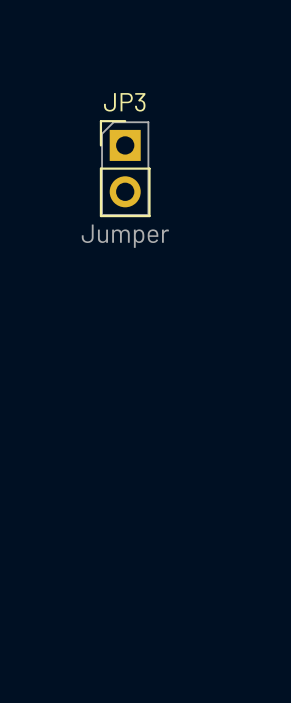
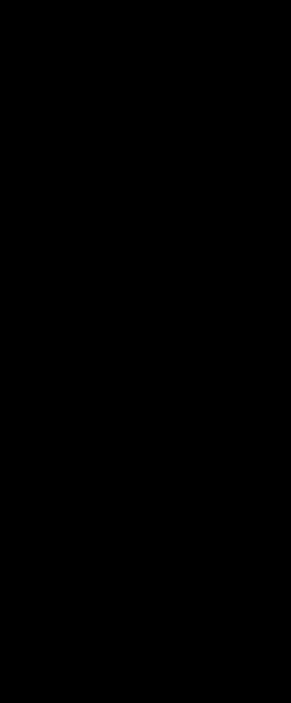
JP3: Jumper (125, 168) -> none

